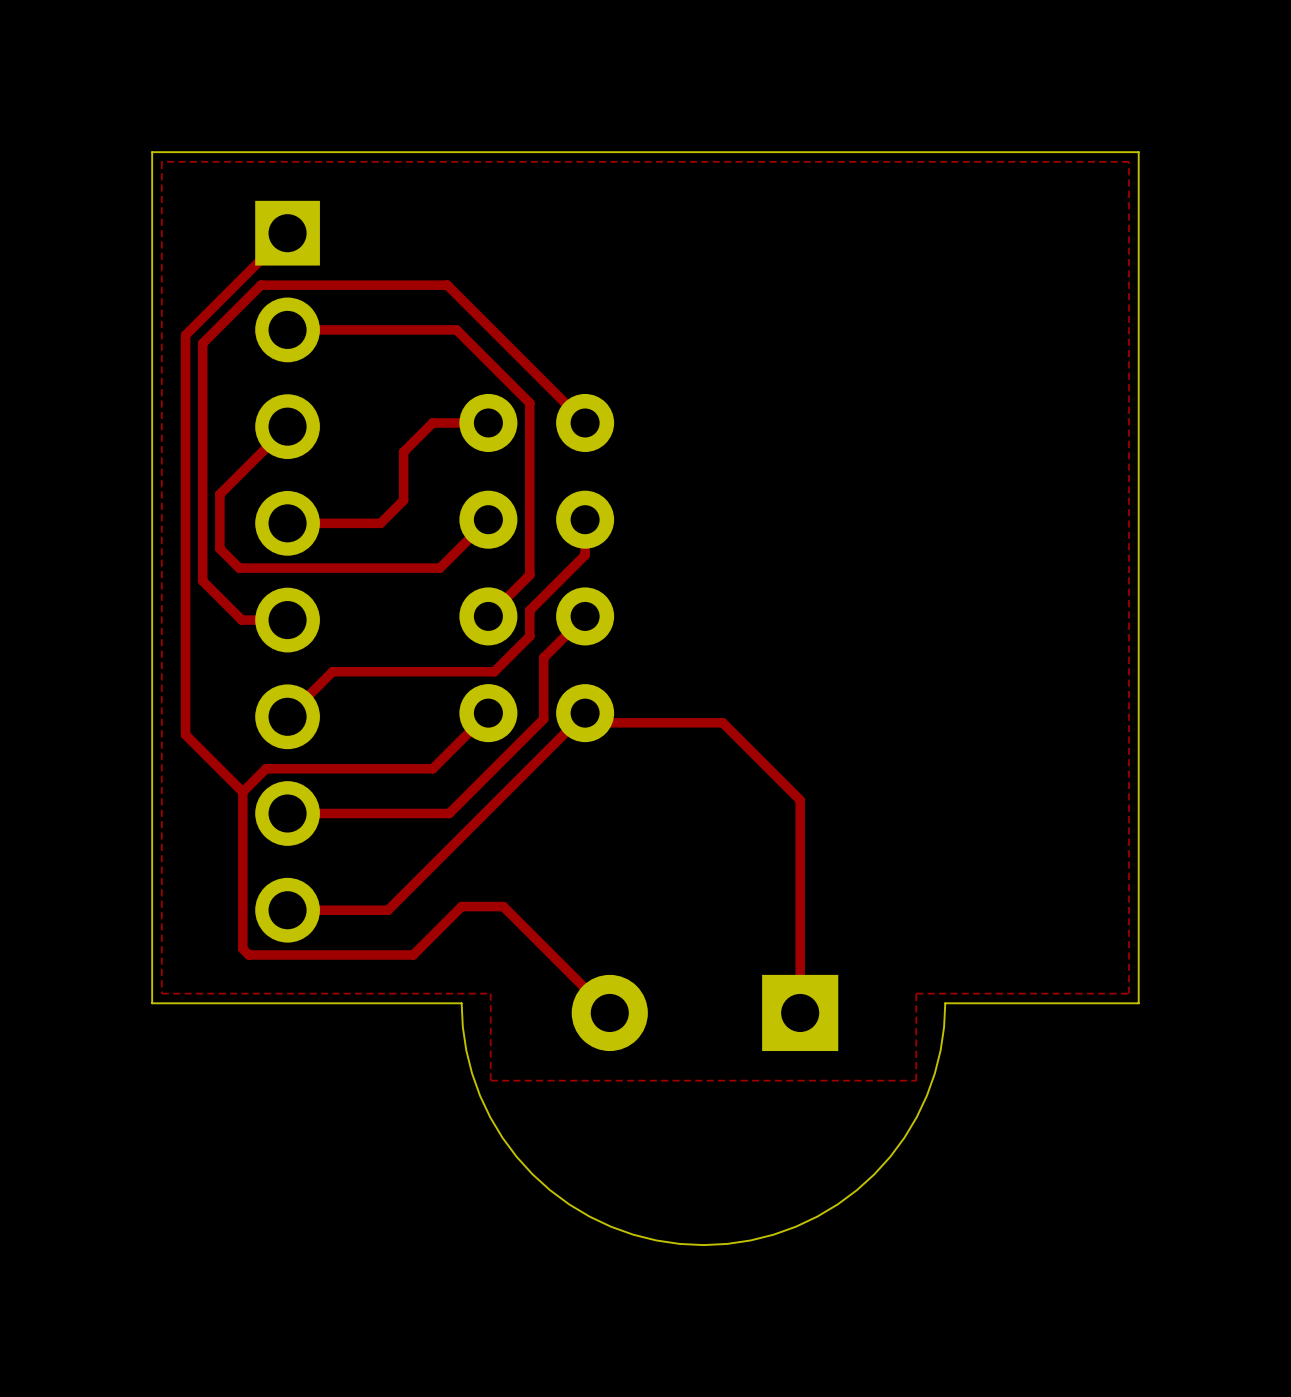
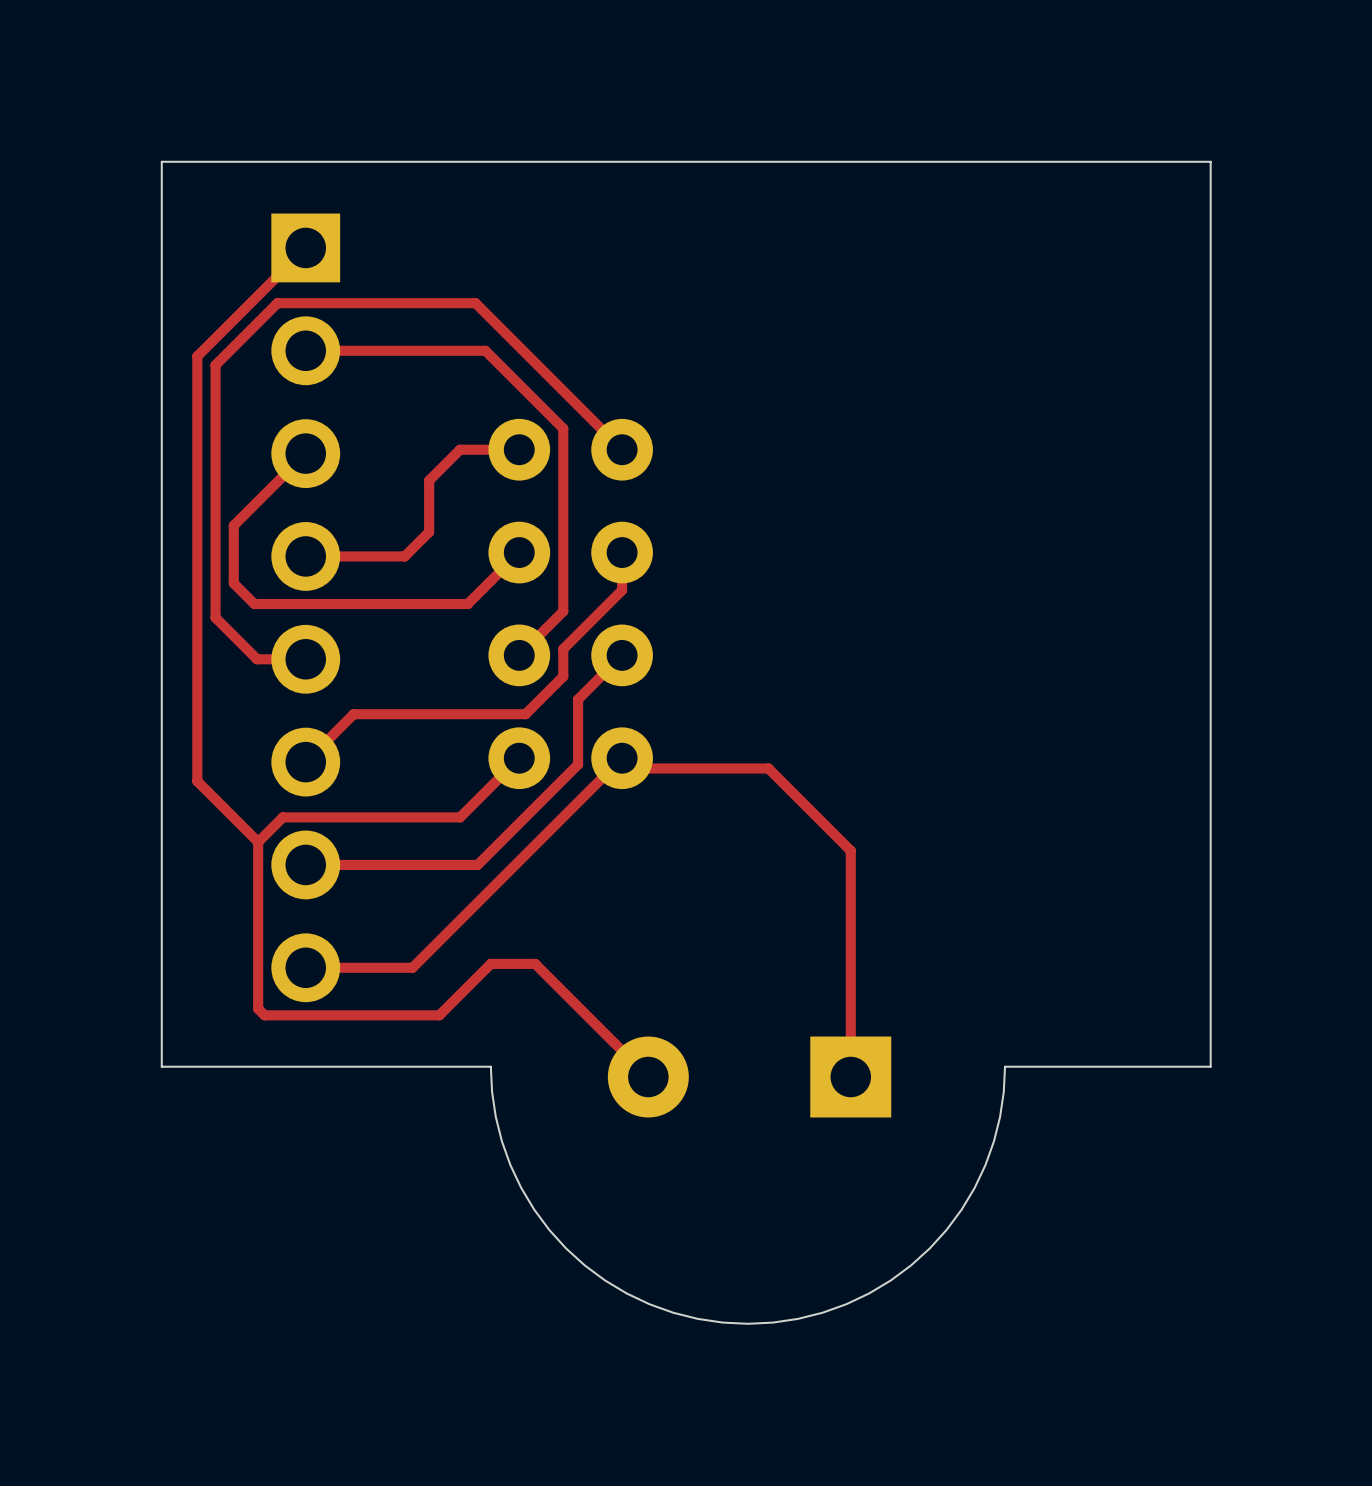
top zone outline: (1129, 161) (1129, 993) (916, 993) (916, 1080) (490, 1080) (490, 993) (161, 993) (161, 161) (1129, 161) -> none

